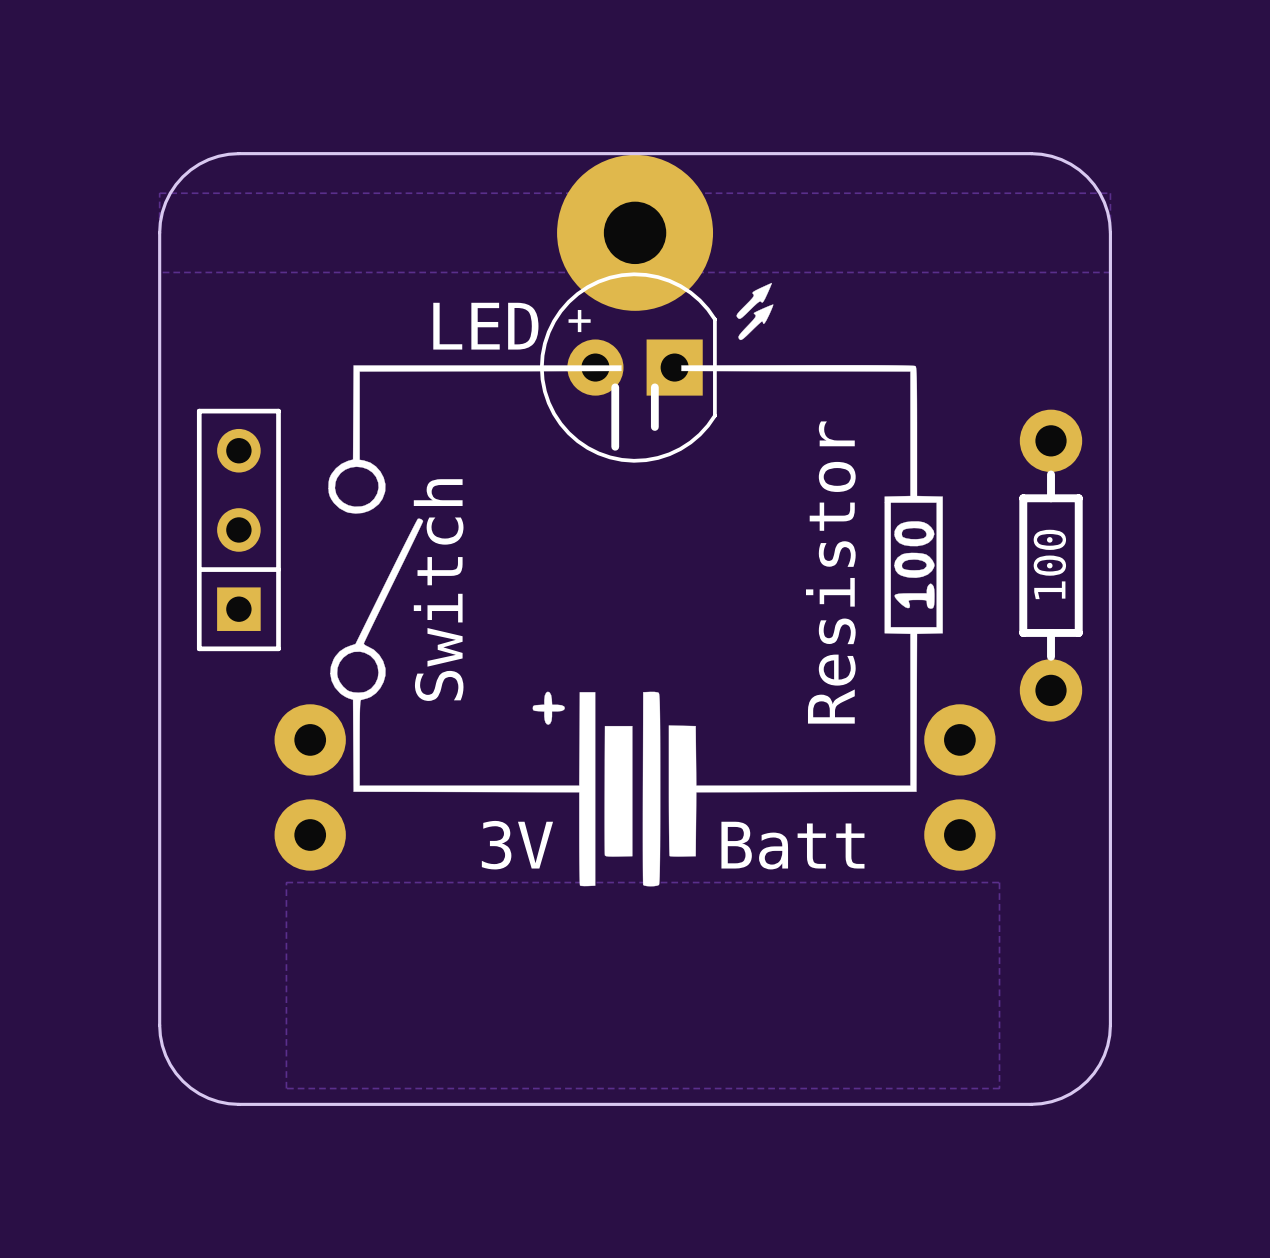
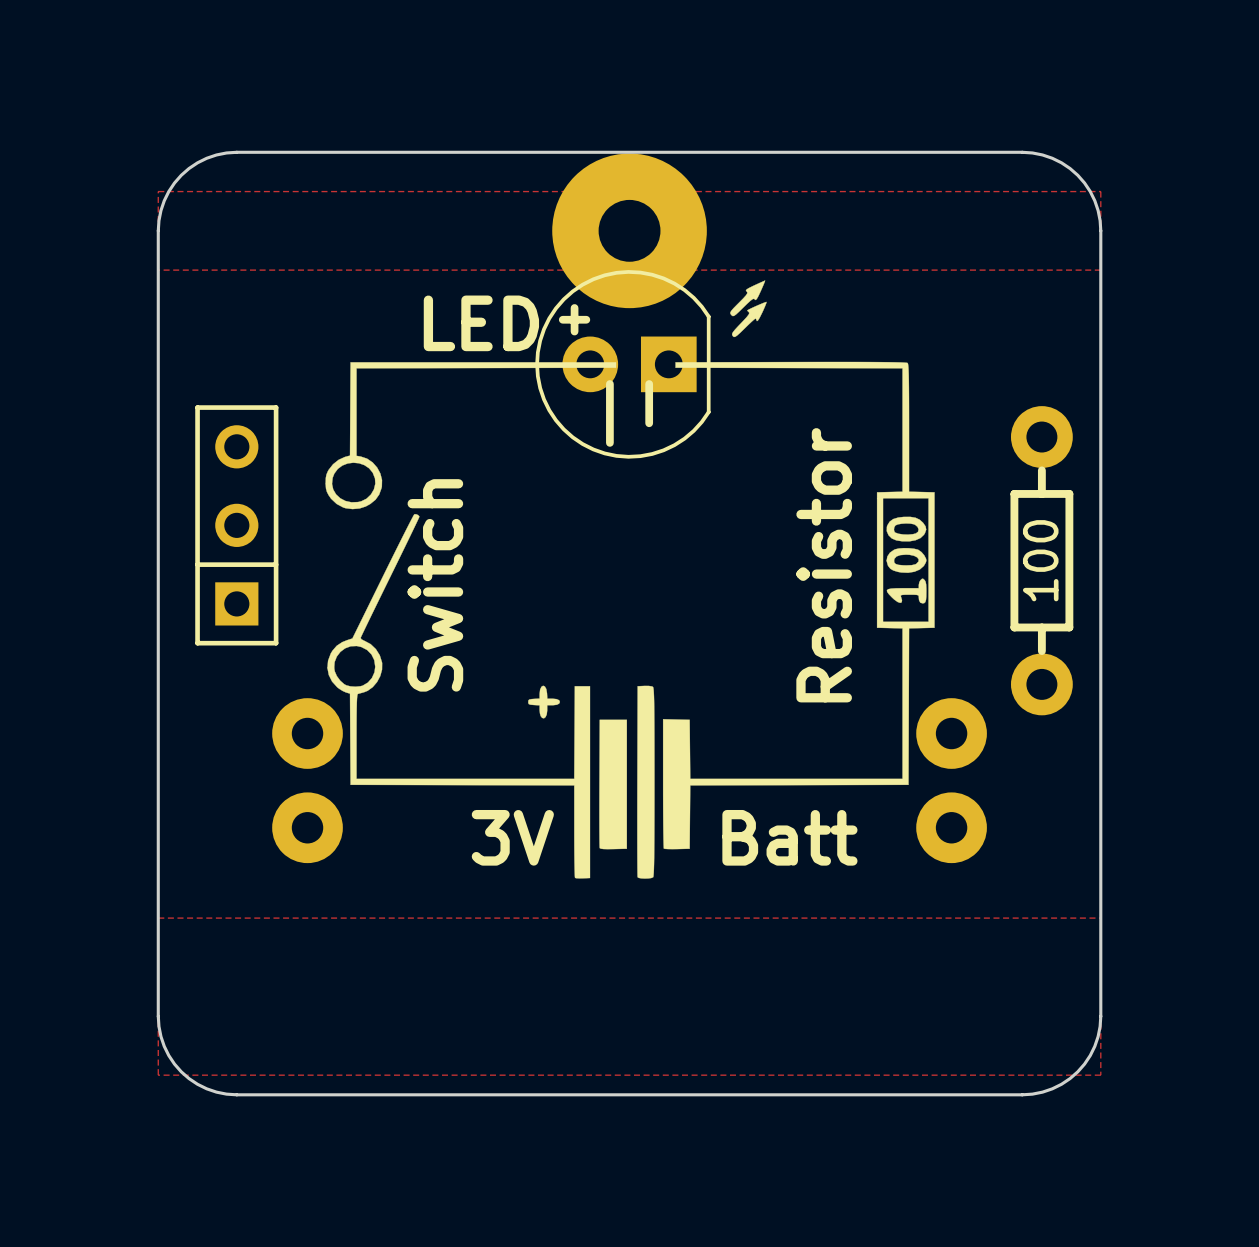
zone outline: (286, 882) (286, 1088) (999, 1088) (999, 882) (286, 882) -> (158, 918) (158, 1075) (1100, 1075) (1100, 918) (158, 918)

